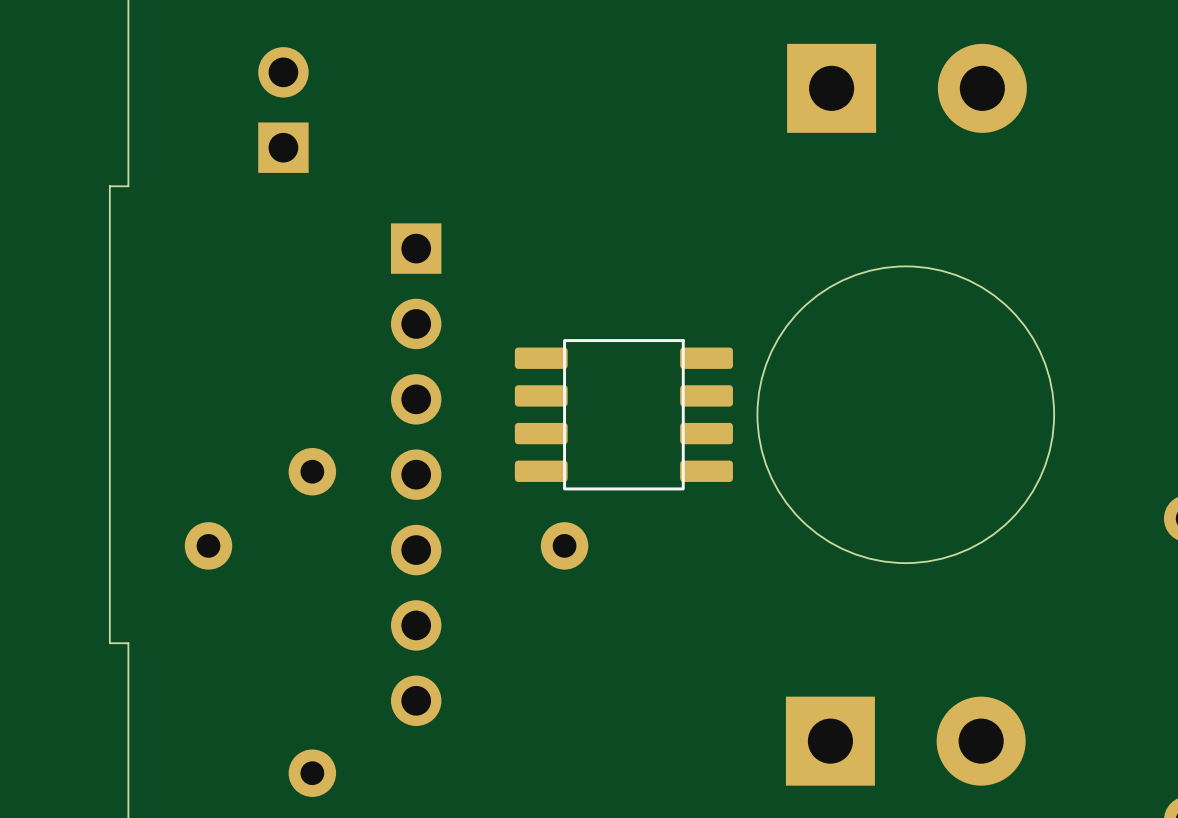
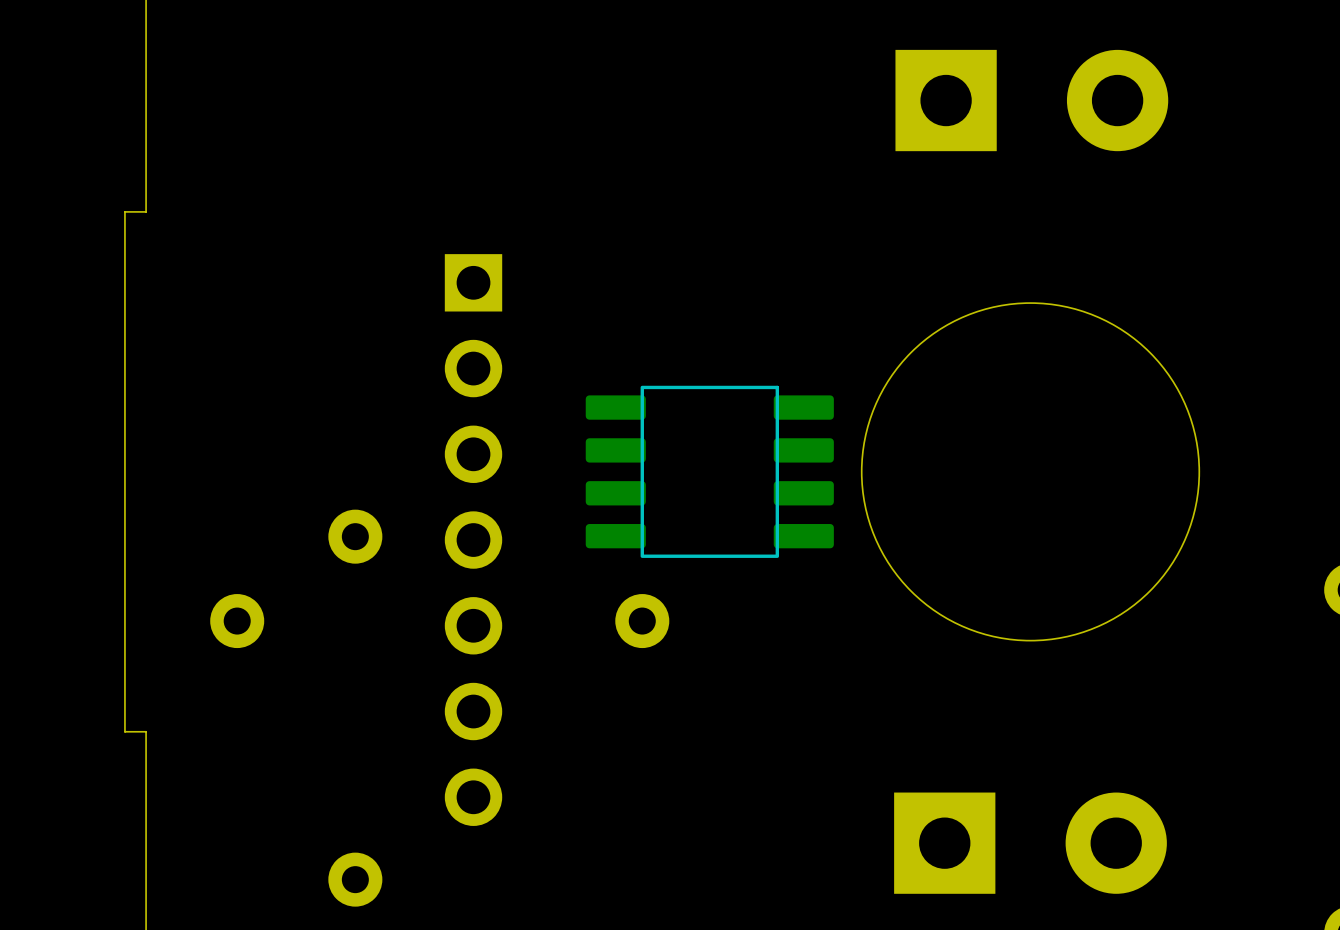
part: (283, 110) -> none

